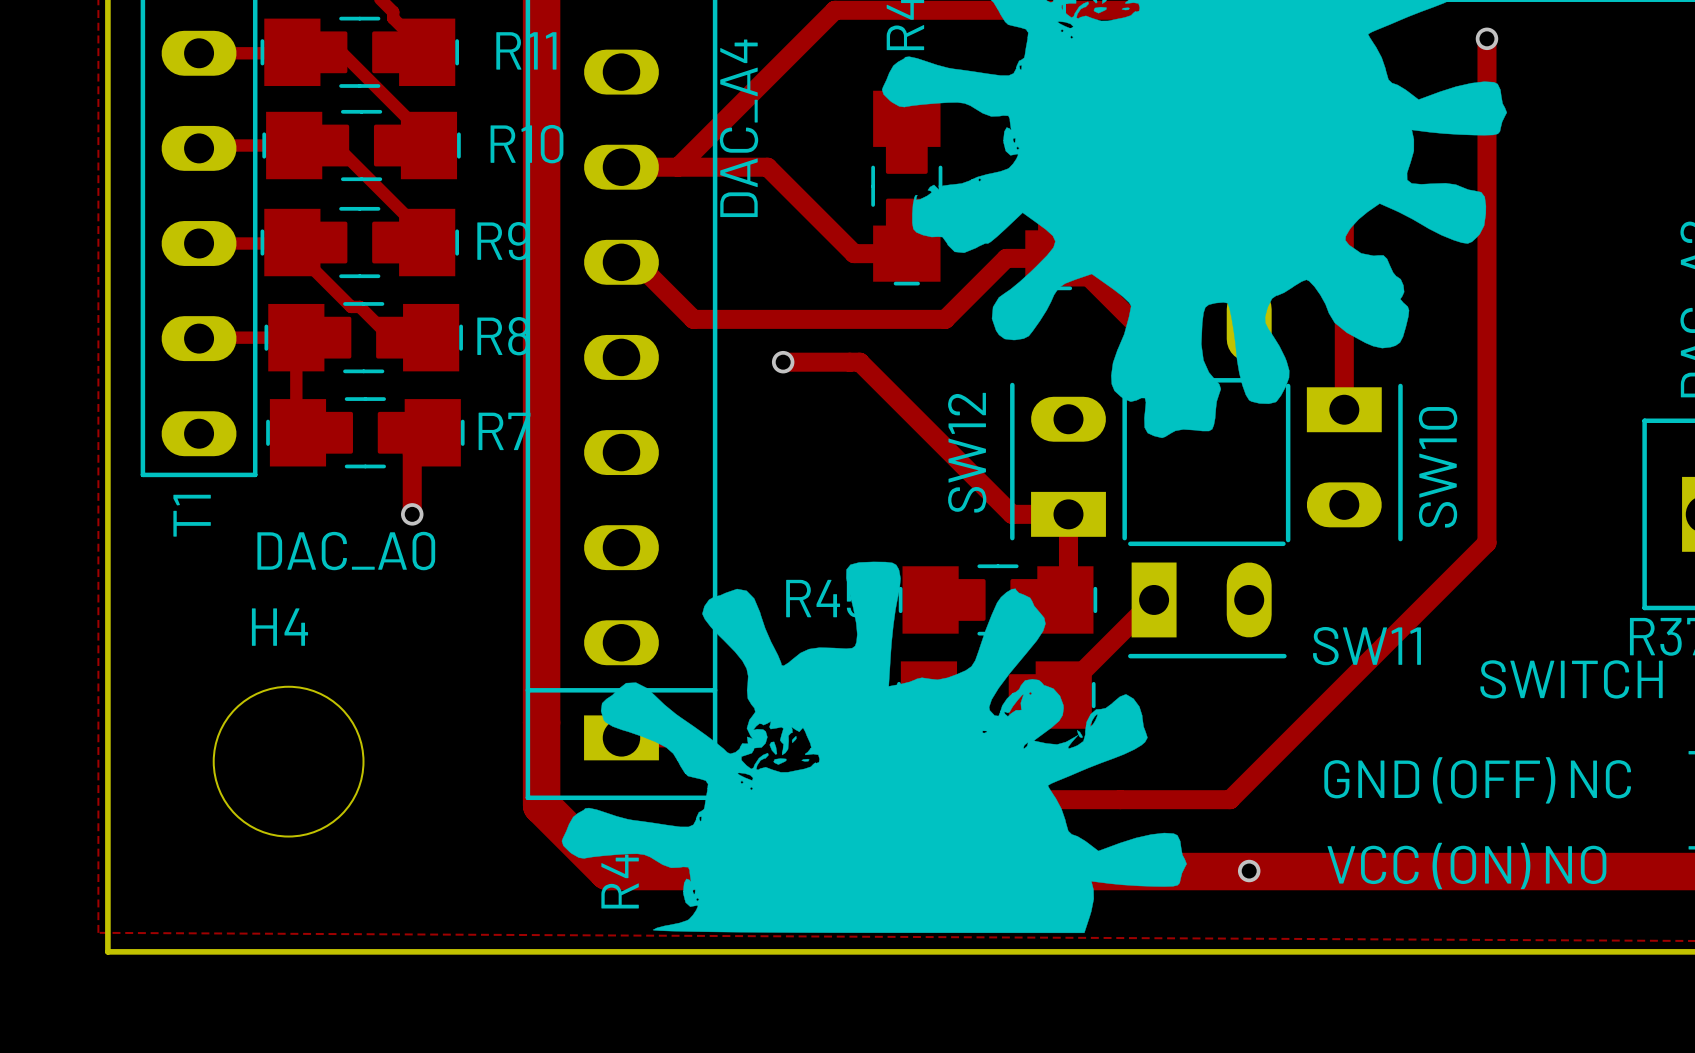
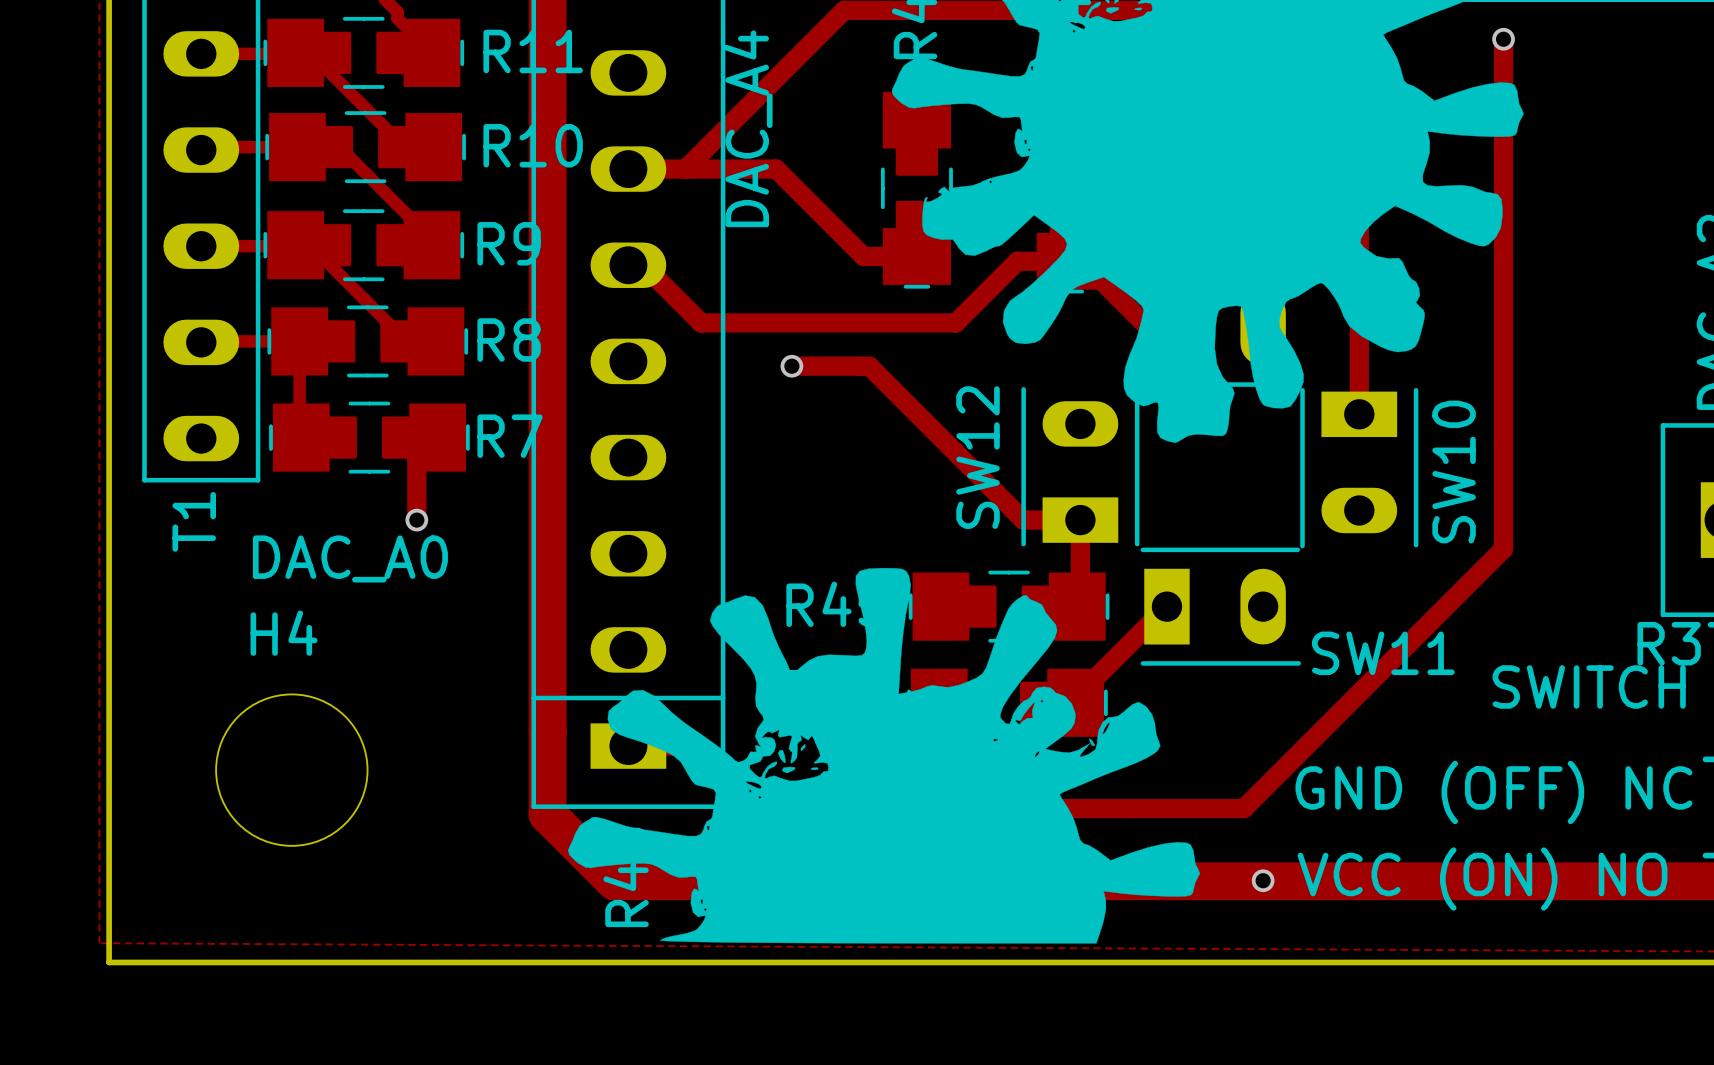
track: (341, 52) (428, 139) -> (315, 58) (404, 147)
track: none -> (304, 239) (395, 329)
track: (292, 248) (351, 306) (359, 306) (390, 337) -> none

